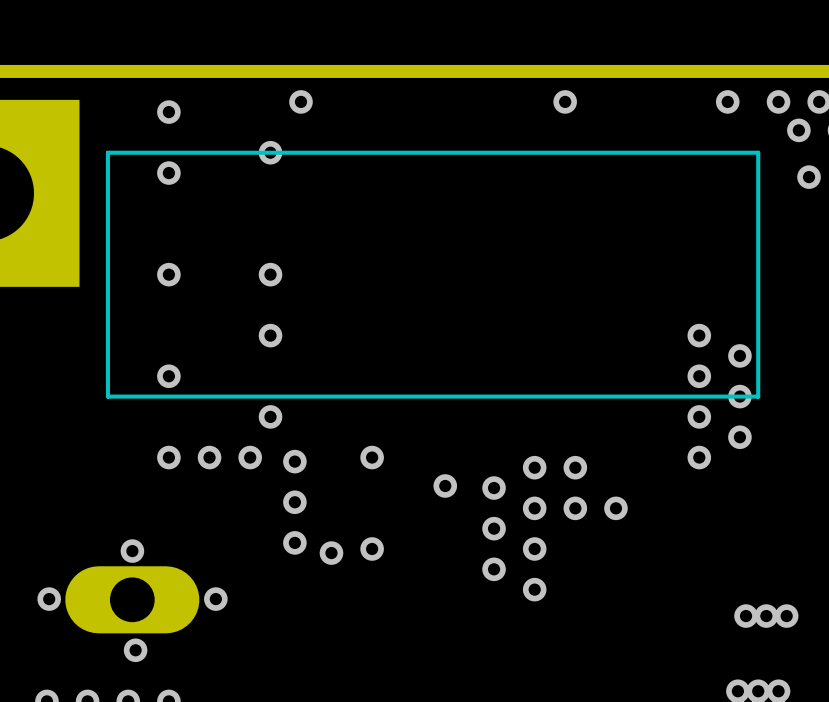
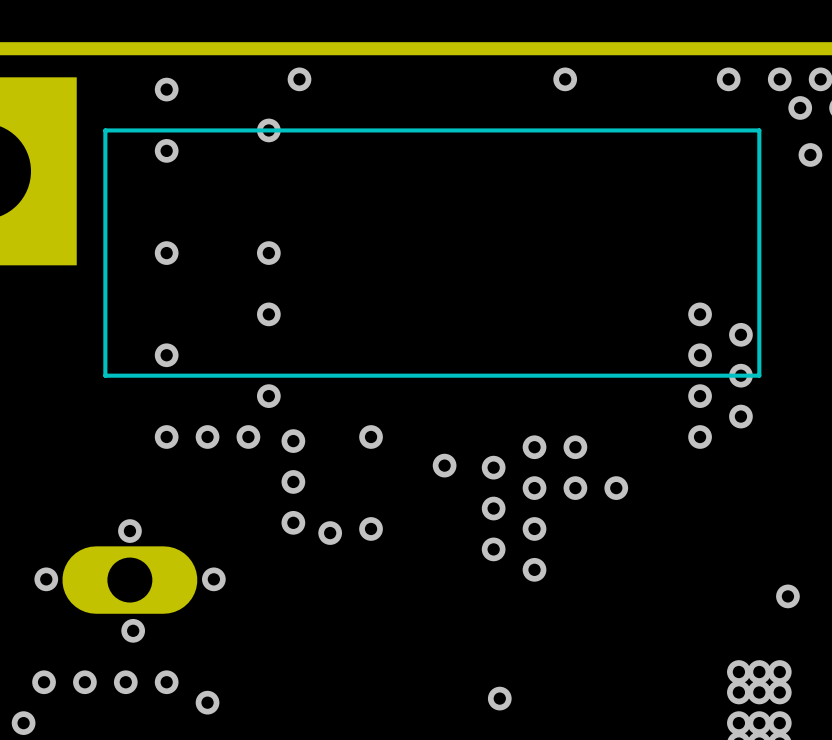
via: (746, 616) -> none
via: (766, 616) -> none

